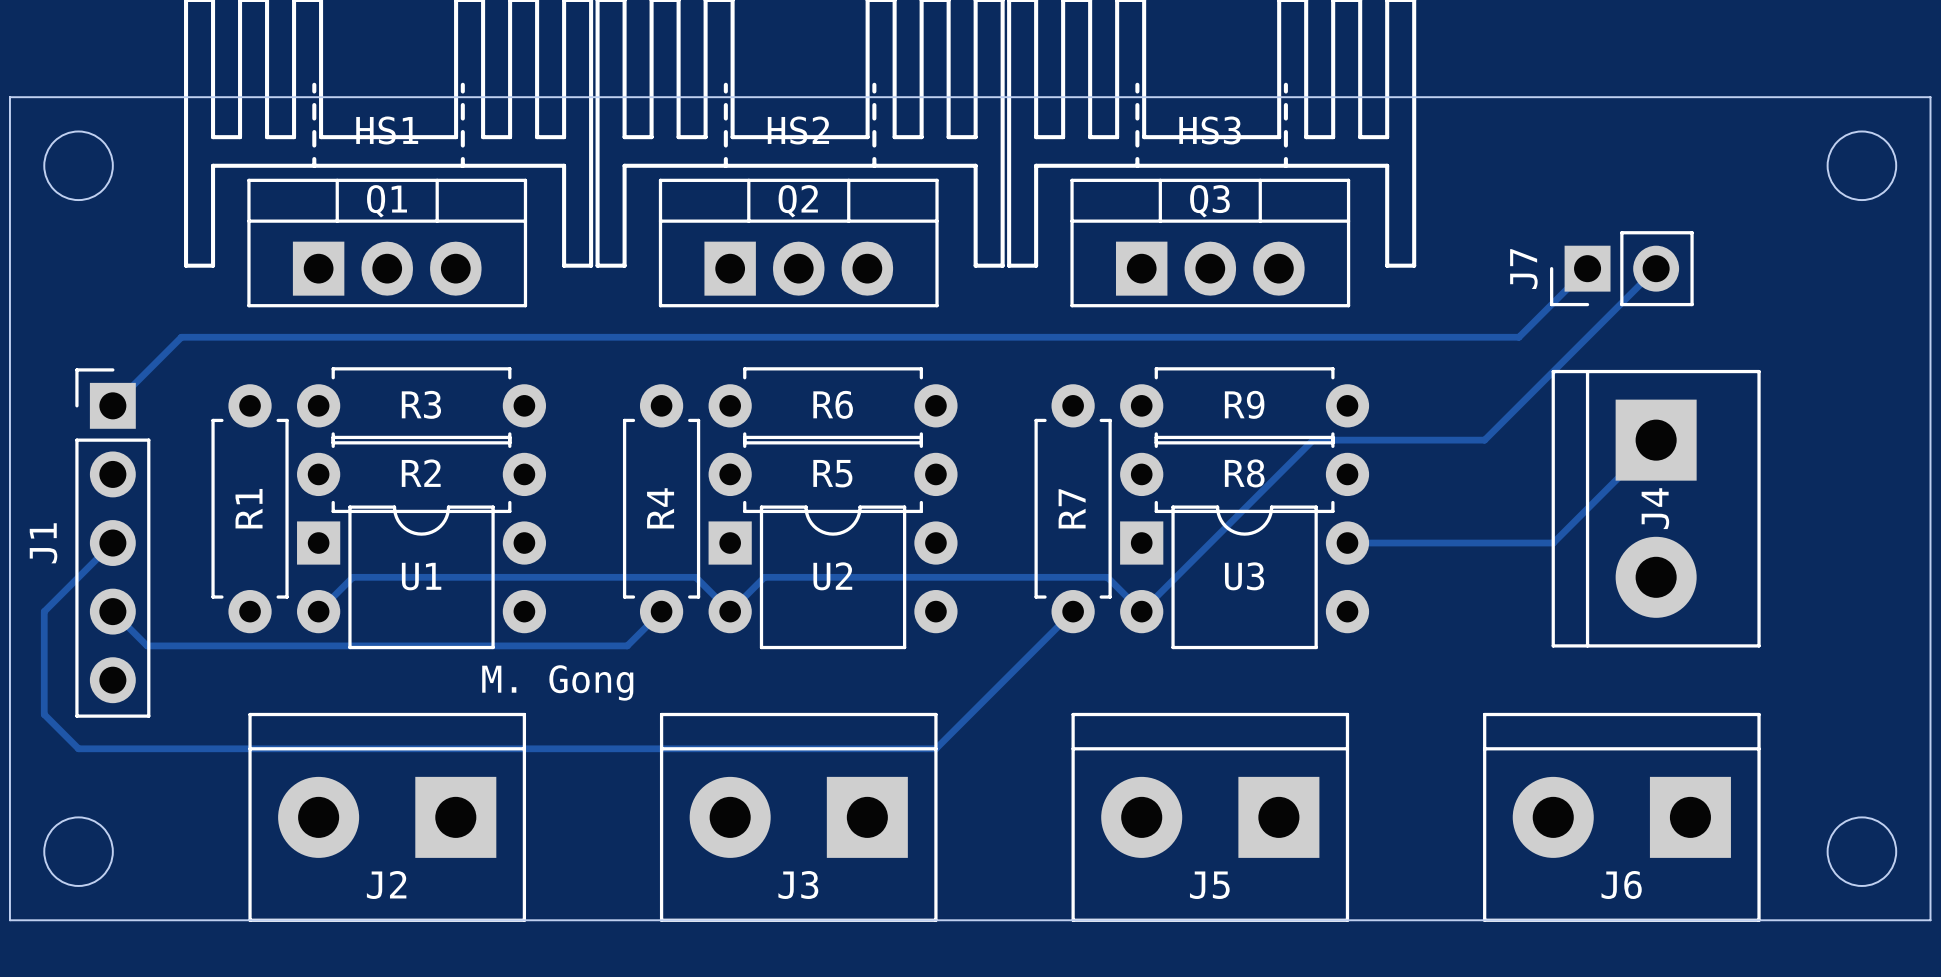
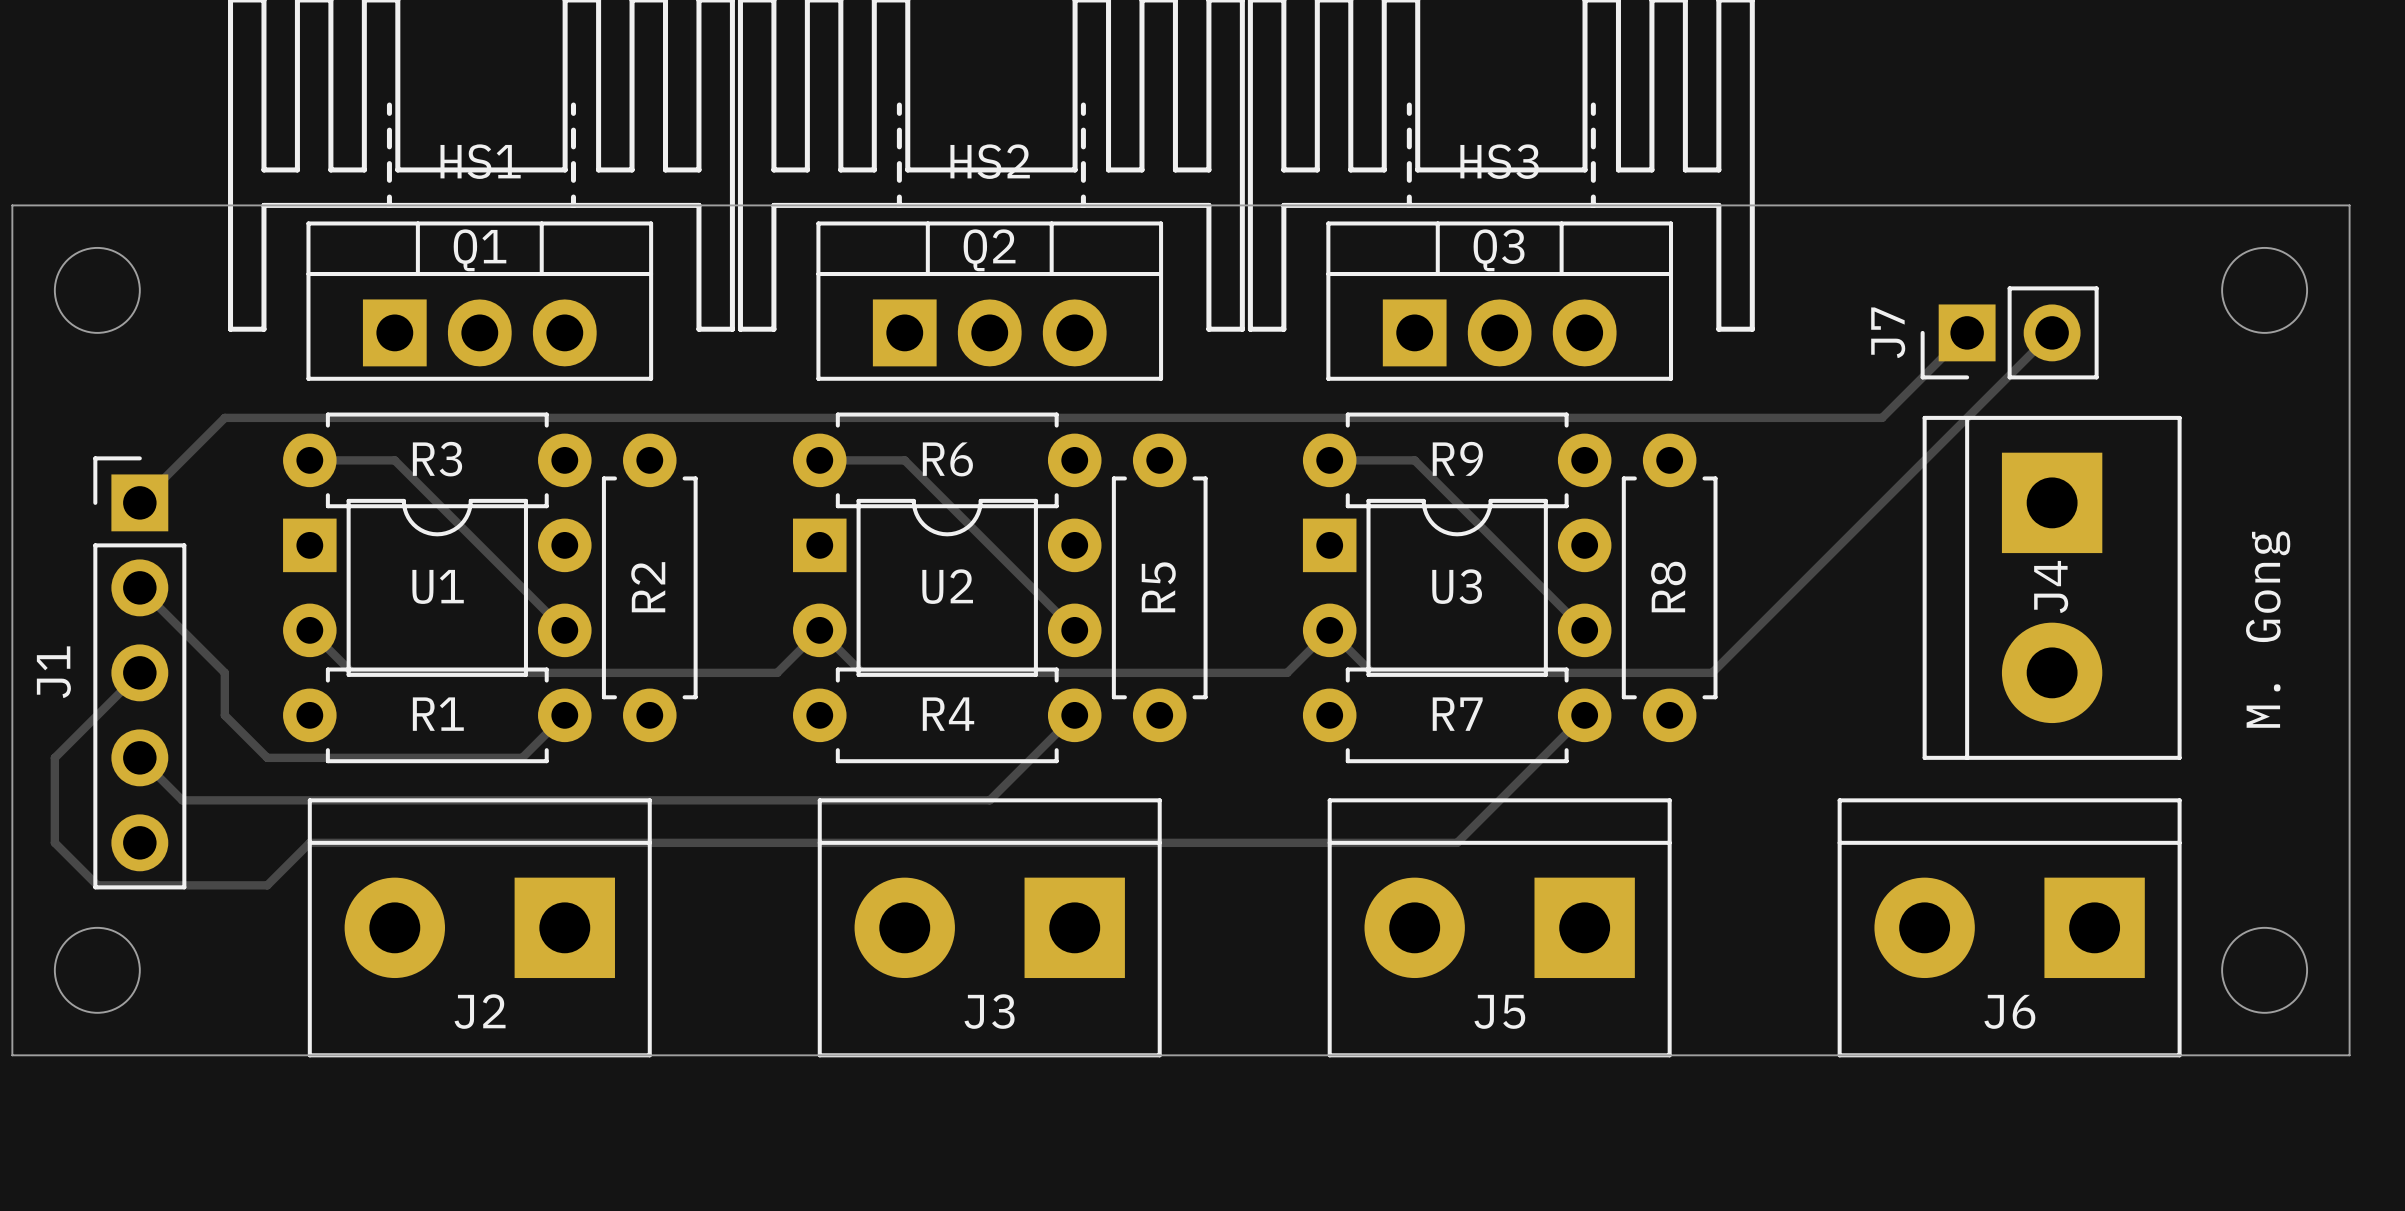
board edge: (9, 165) (9, 97) (1930, 97) (1930, 920) (9, 920) (9, 851) -> (12, 205) (2349, 205) (2349, 1055) (12, 1055)
round board edge position: (78, 165) -> (97, 290)
round board edge position: (1861, 165) -> (2264, 290)
track: none -> (309, 460) (394, 460) (564, 630)
track: none -> (819, 460) (904, 460) (1074, 630)
track: none -> (1329, 460) (1414, 460) (1584, 630)
R3 position: (421, 405) -> (437, 460)
R6 position: (833, 405) -> (947, 460)
R9 position: (1244, 405) -> (1457, 460)
track: (1484, 440) (1313, 440) (1141, 611) (1107, 577) (764, 577) (730, 611) (695, 577) (352, 577) (318, 611) -> none
track: (1656, 440) (1553, 543) (1381, 543) -> (1839, 545) (1712, 672)
track: none -> (139, 587) (224, 672) (224, 715) (267, 757) (522, 757) (564, 715)
R2 rotation: 0° (421, 474) -> 90° clockwise (649, 587)
R5 rotation: 0° (833, 474) -> 90° clockwise (1159, 587)
R8 rotation: 0° (1244, 474) -> 90° clockwise (1669, 587)
track: none -> (309, 630) (352, 672) (777, 672) (819, 630) (862, 672) (1287, 672) (1329, 630) (1372, 672) (1669, 672)
R1 rotation: 0° (250, 508) -> 90° clockwise (437, 715)
R4 rotation: 0° (661, 508) -> 90° clockwise (947, 715)
R7 rotation: 0° (1073, 508) -> 90° clockwise (1457, 715)
J4 position: (1656, 508) -> (2052, 587)
text: none -> M. Gong (2268, 629)
U1 position: (421, 577) -> (437, 587)
U2 position: (833, 577) -> (947, 587)
U3 position: (1244, 577) -> (1457, 587)
track: (661, 611) (627, 645) -> (1074, 715) (989, 800) (777, 800)
track: (1073, 611) (935, 748) (78, 748) (44, 714) (44, 680) -> (1584, 715) (1457, 842) (309, 842) (267, 885) (97, 885) (54, 842)
text: M. Gong (557, 682) -> none
J2 position: (387, 817) -> (479, 927)
J3 position: (798, 817) -> (989, 927)
J5 position: (1210, 817) -> (1499, 927)
J6 position: (1621, 817) -> (2009, 927)
round board edge position: (78, 851) -> (97, 970)
round board edge position: (1861, 851) -> (2264, 970)

